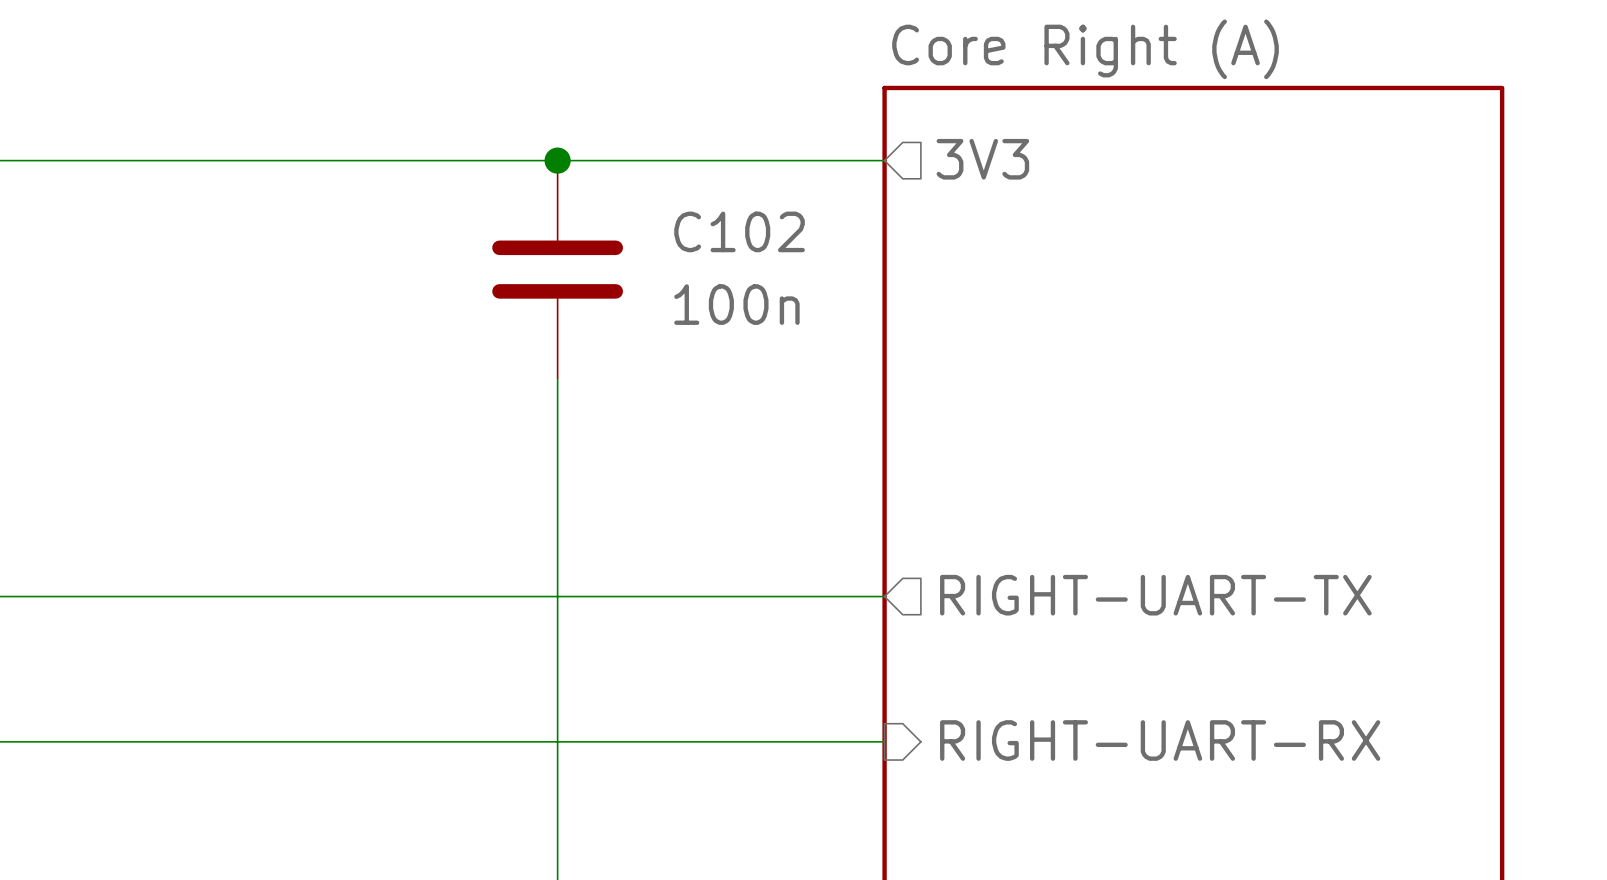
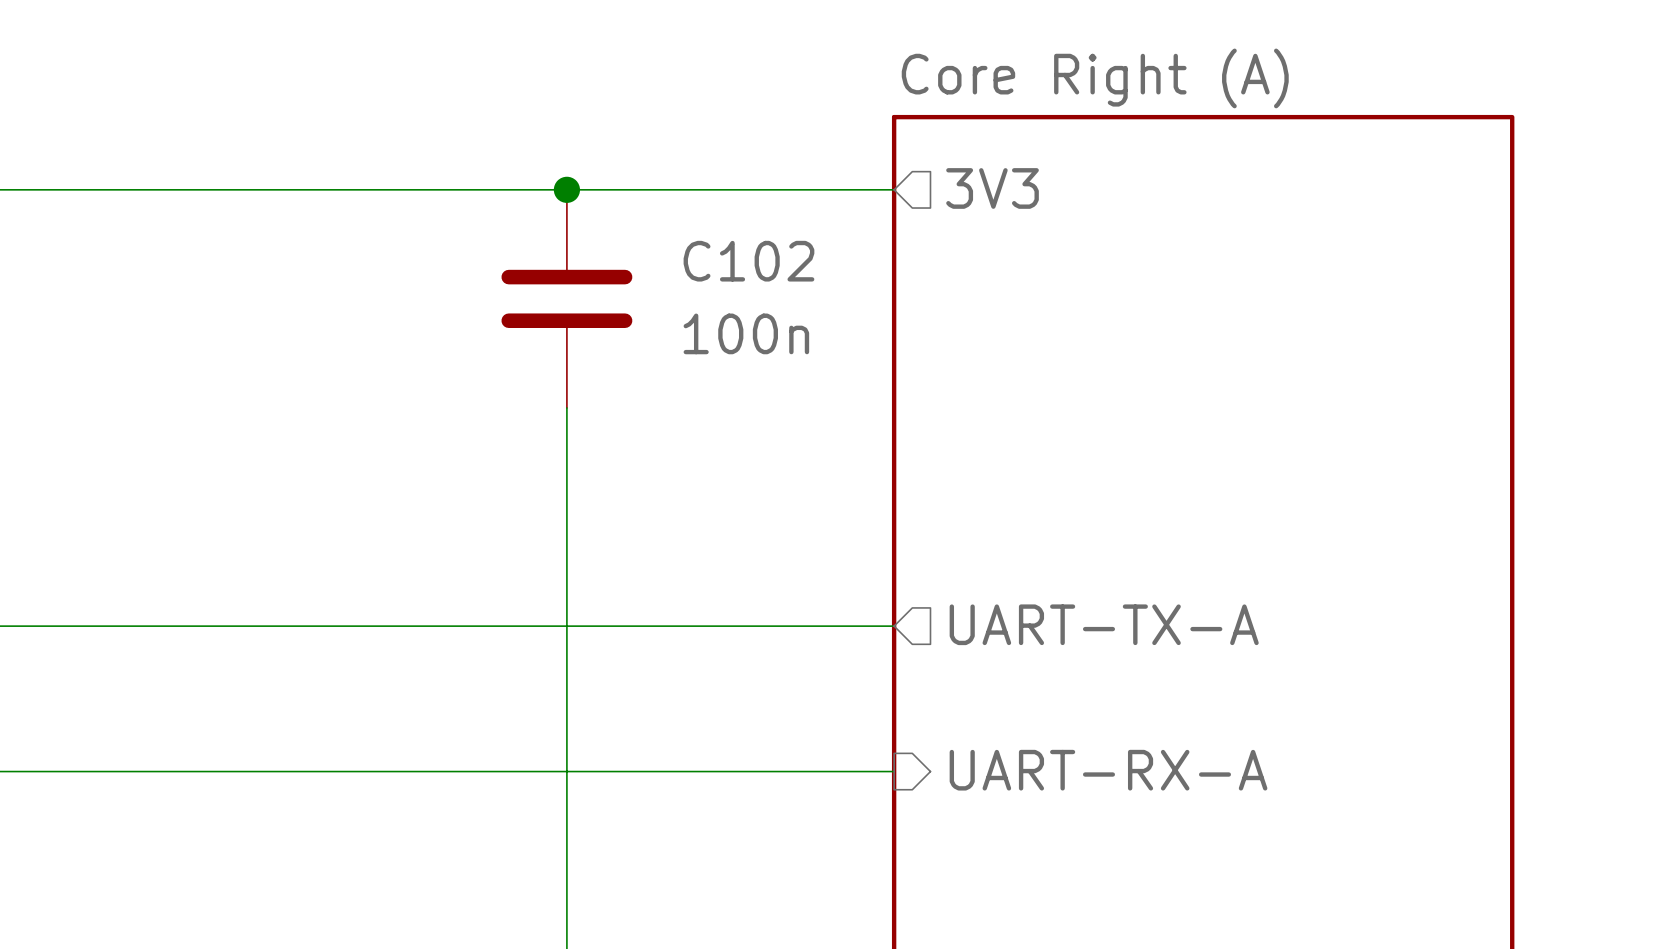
sheet pin: RIGHT-UART-TX (1155, 595) -> UART-TX-A (1104, 624)
sheet pin: RIGHT-UART-RX (1160, 740) -> UART-RX-A (1108, 770)

